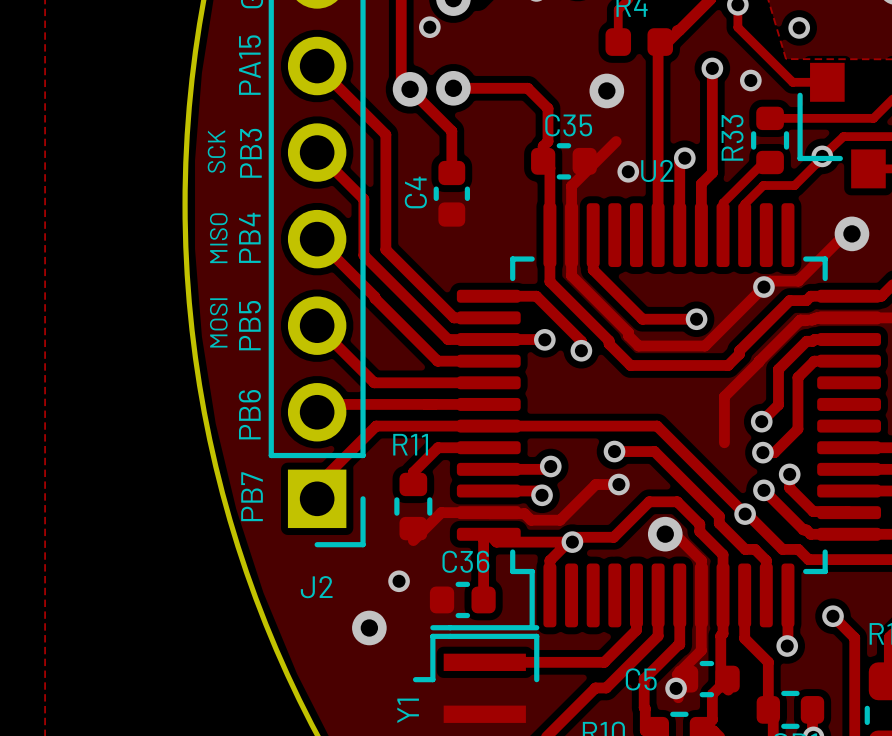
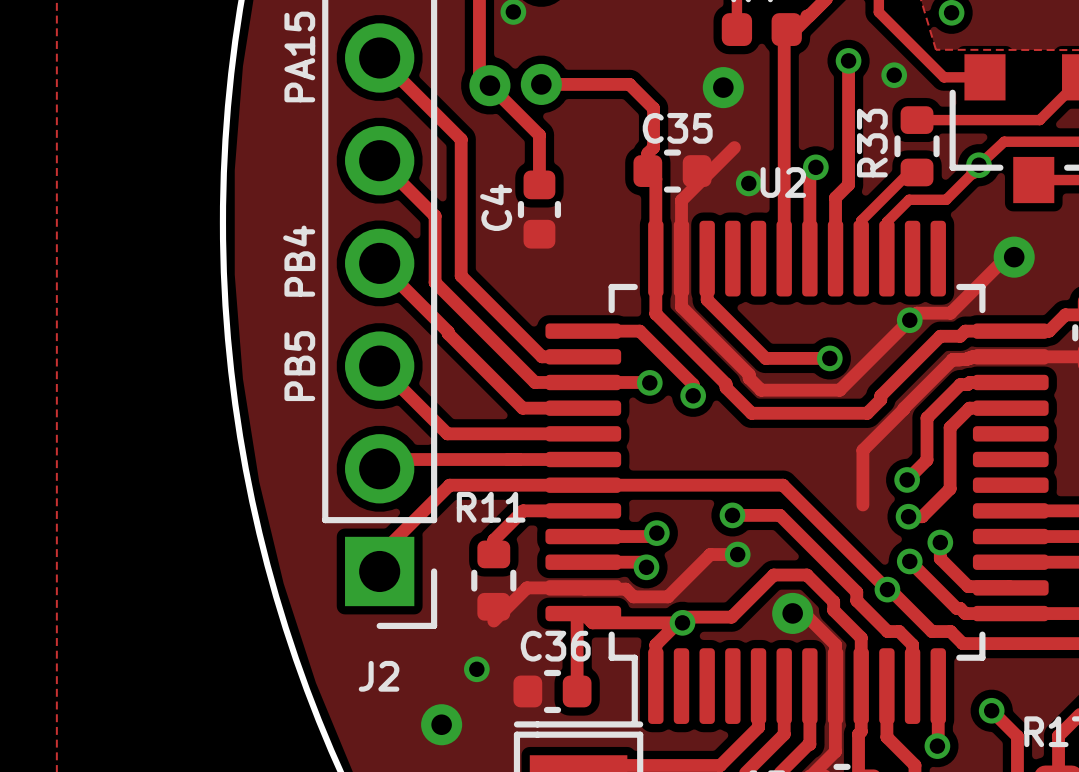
text: SCK (216, 151) -> none
text: PB3 (251, 153) -> none
text: MISO (218, 238) -> none
text: MOSI (218, 322) -> none
text: PB6 (249, 414) -> none
text: PB7 (252, 496) -> none

